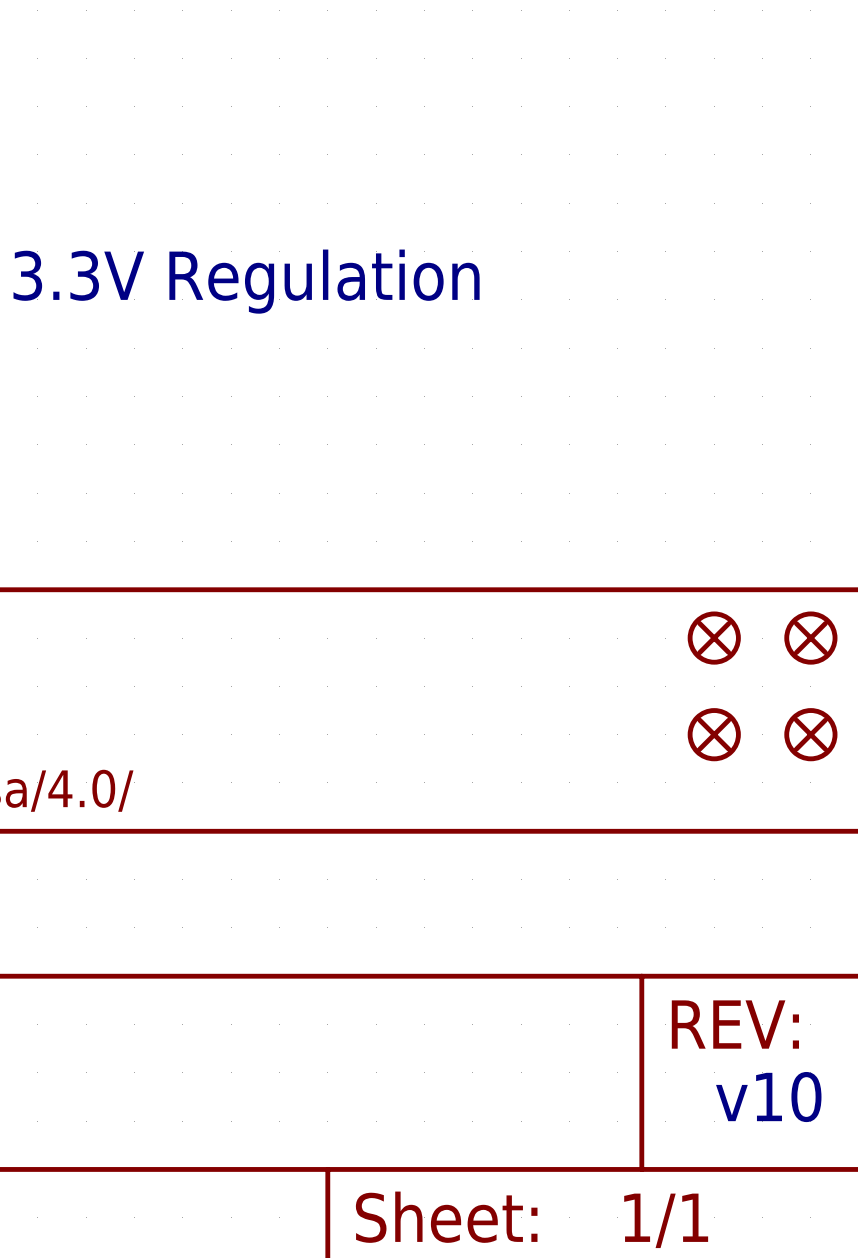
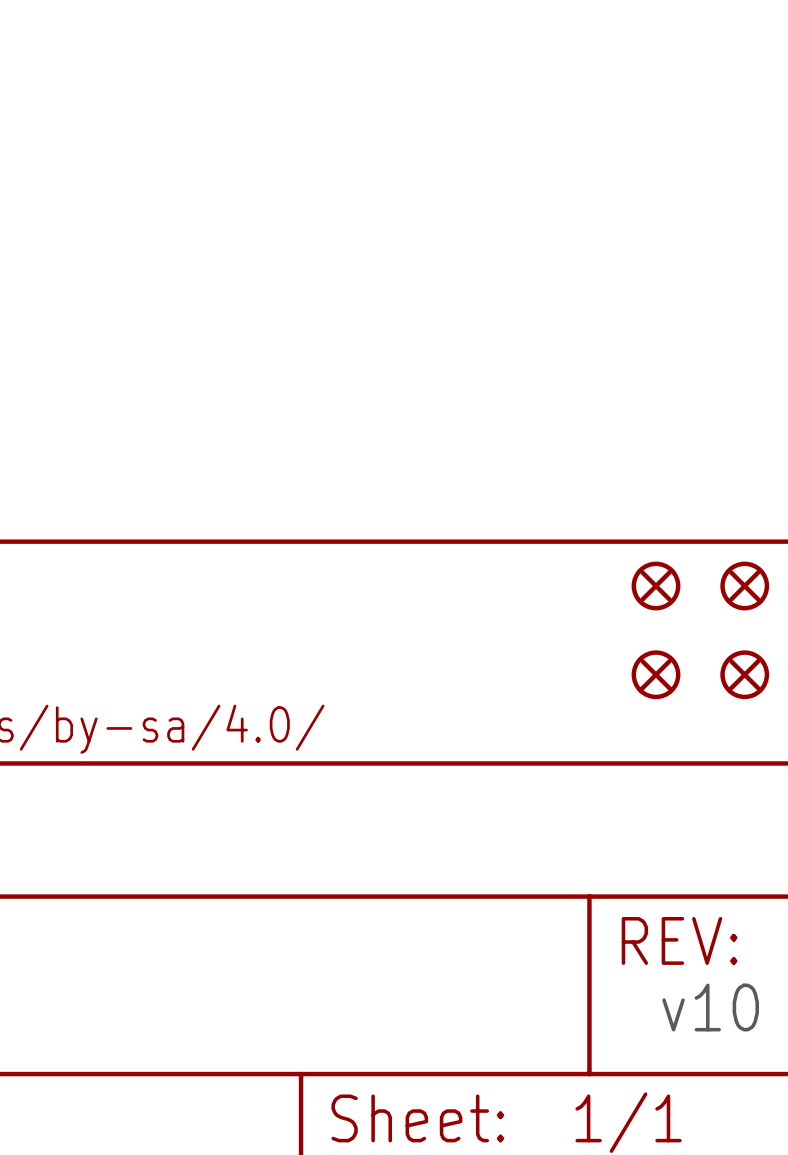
text: 3.3V Regulation (246, 281) -> none

